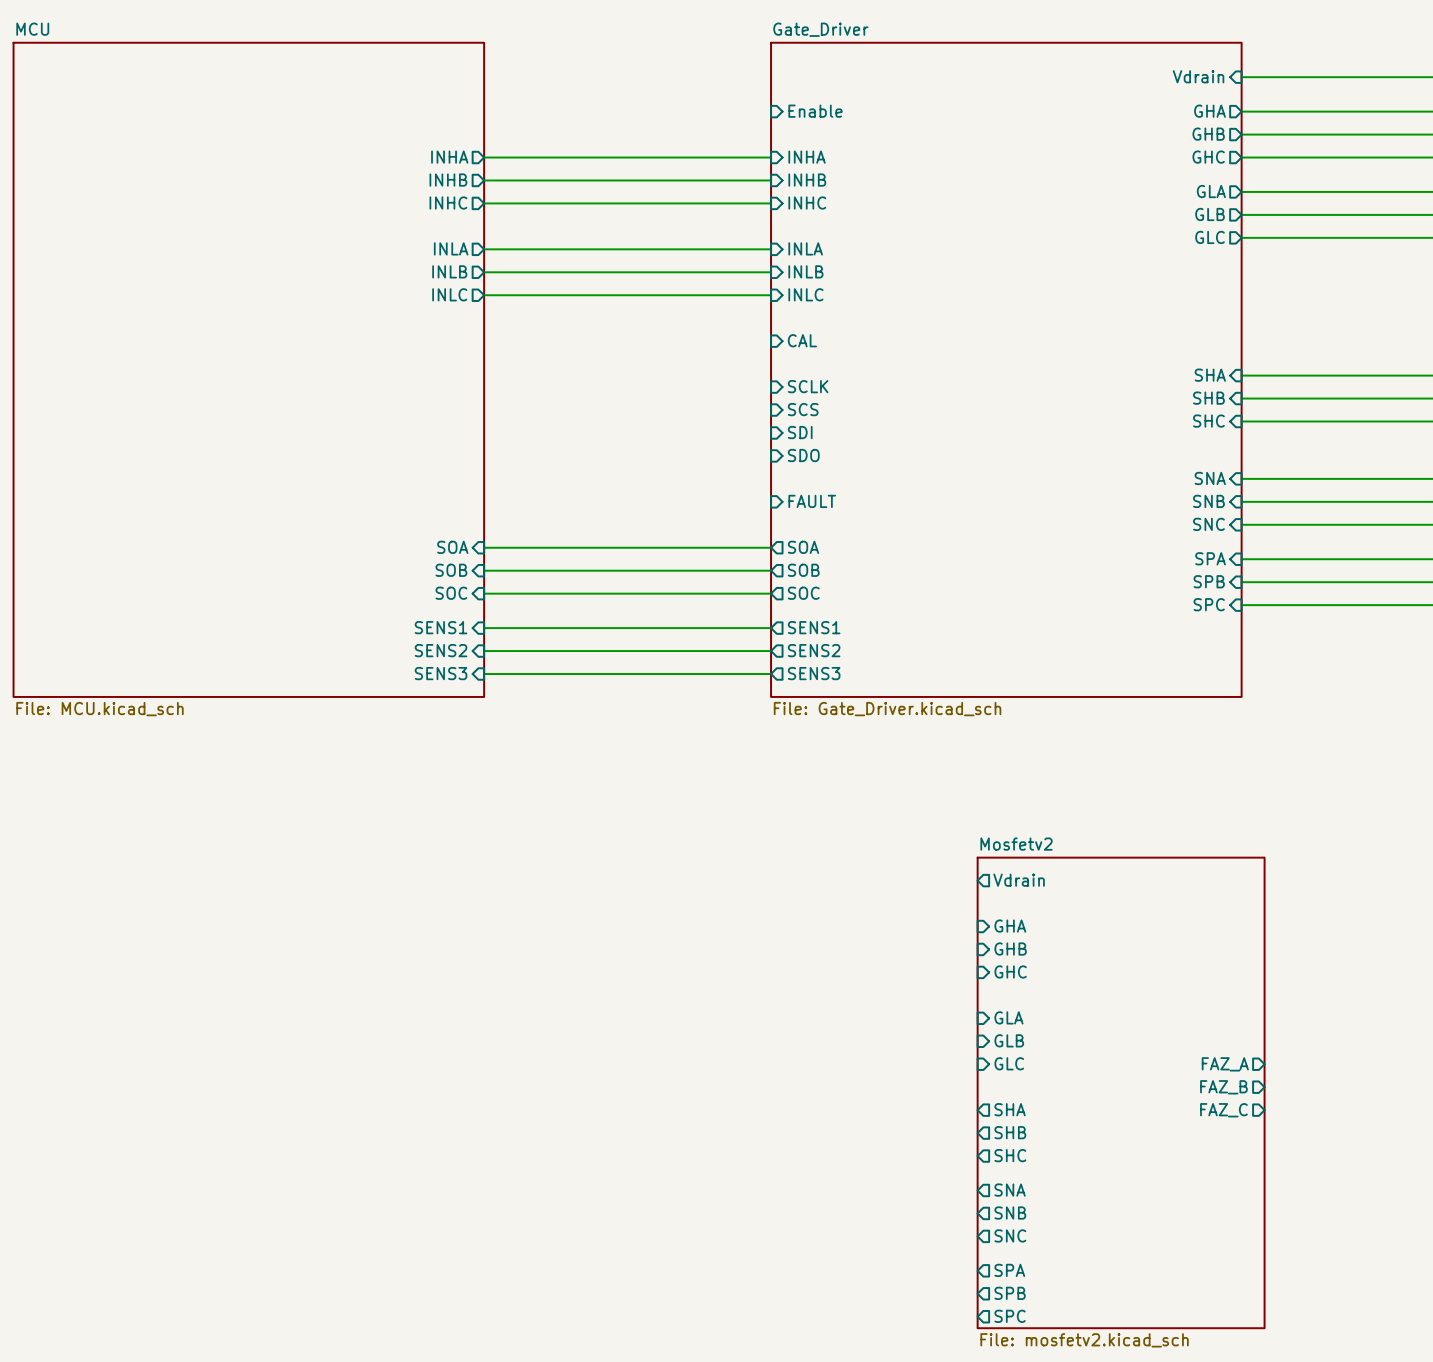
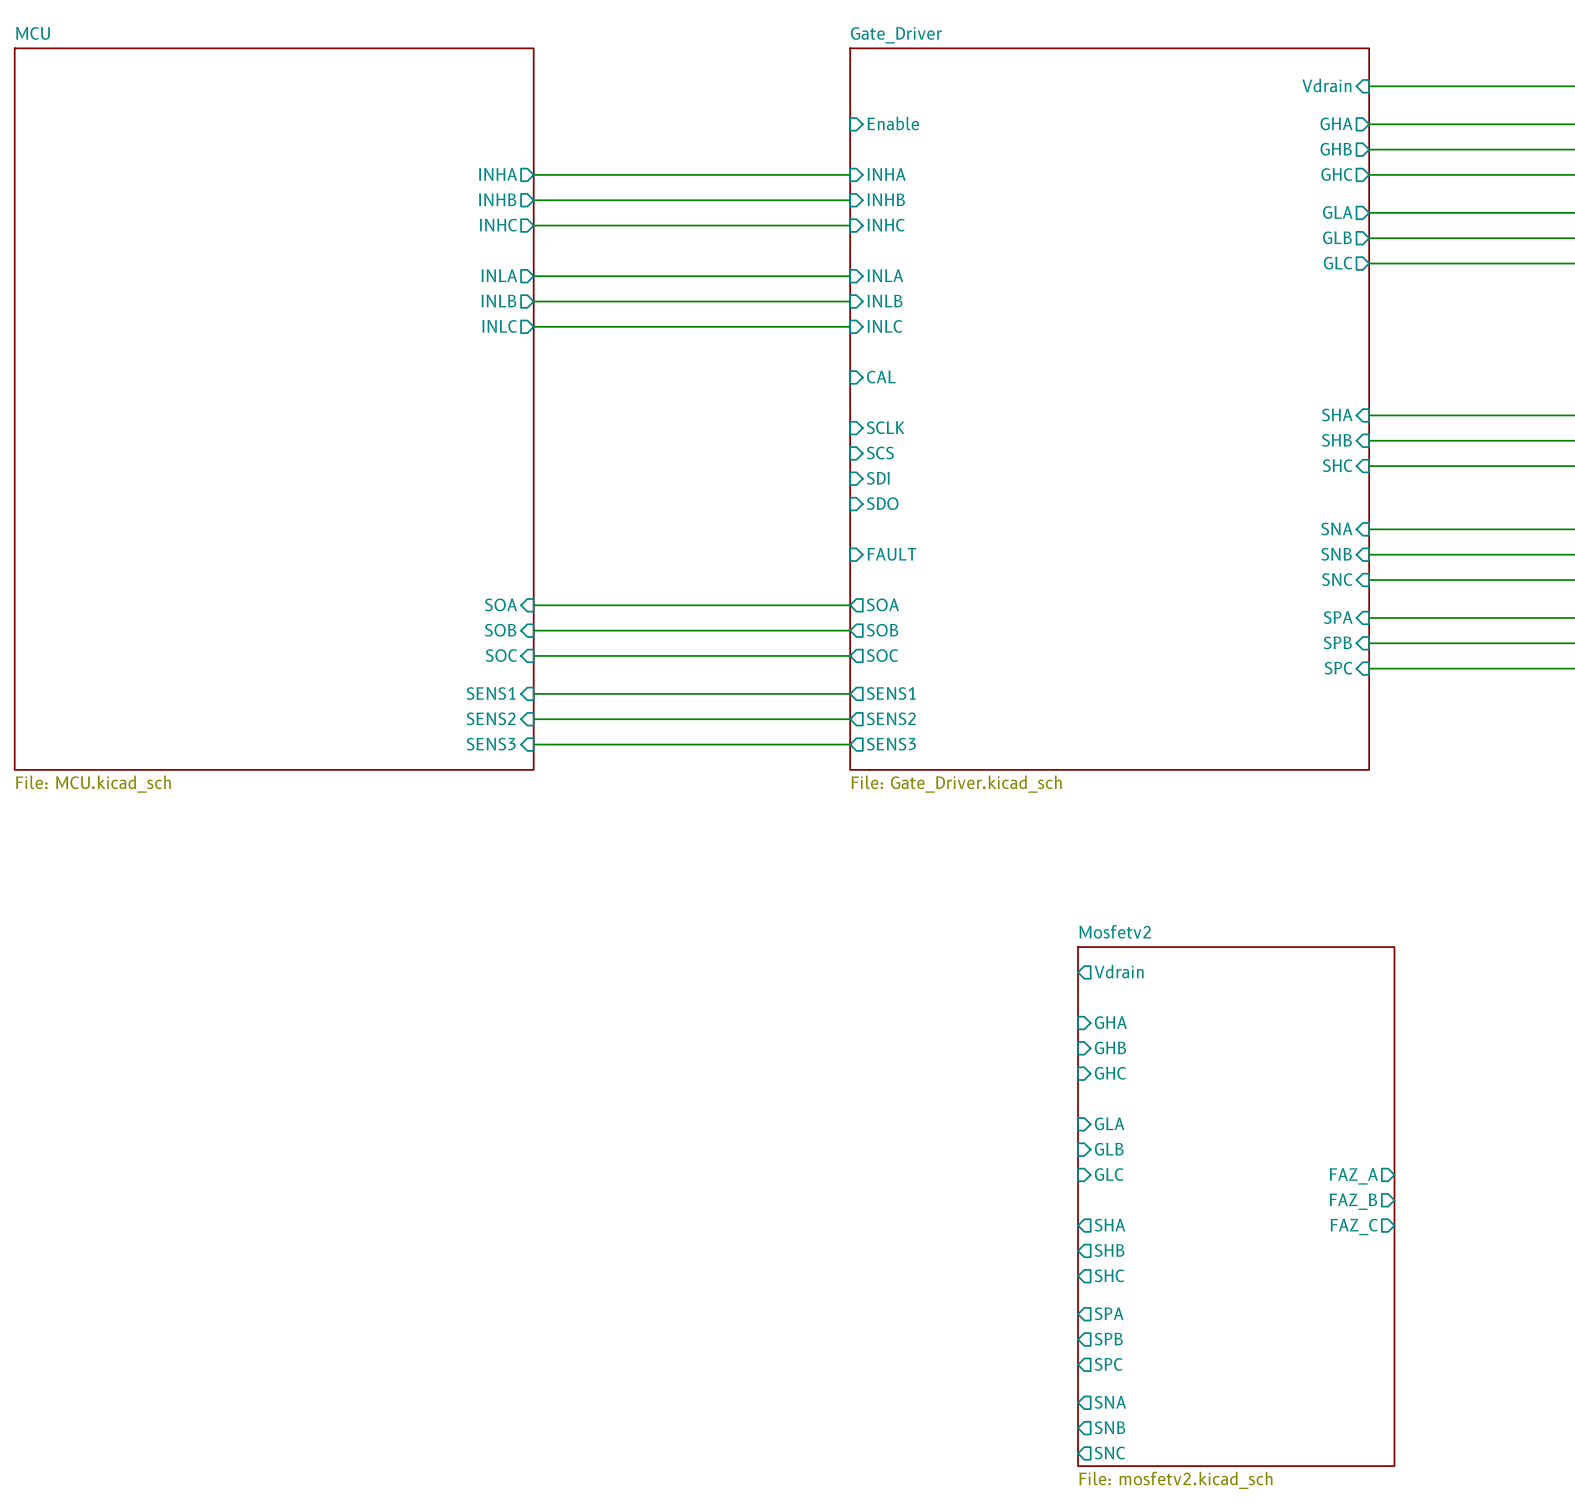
sheet pin: SNA (1010, 1190) -> SPA (1109, 1313)
sheet pin: SNB (1010, 1213) -> SPB (1108, 1339)
sheet pin: SNC (1010, 1235) -> SPC (1108, 1364)
sheet pin: SPA (1009, 1270) -> SNA (1110, 1402)
sheet pin: SPB (1010, 1293) -> SNB (1110, 1427)
sheet pin: SPC (1010, 1316) -> SNC (1109, 1453)

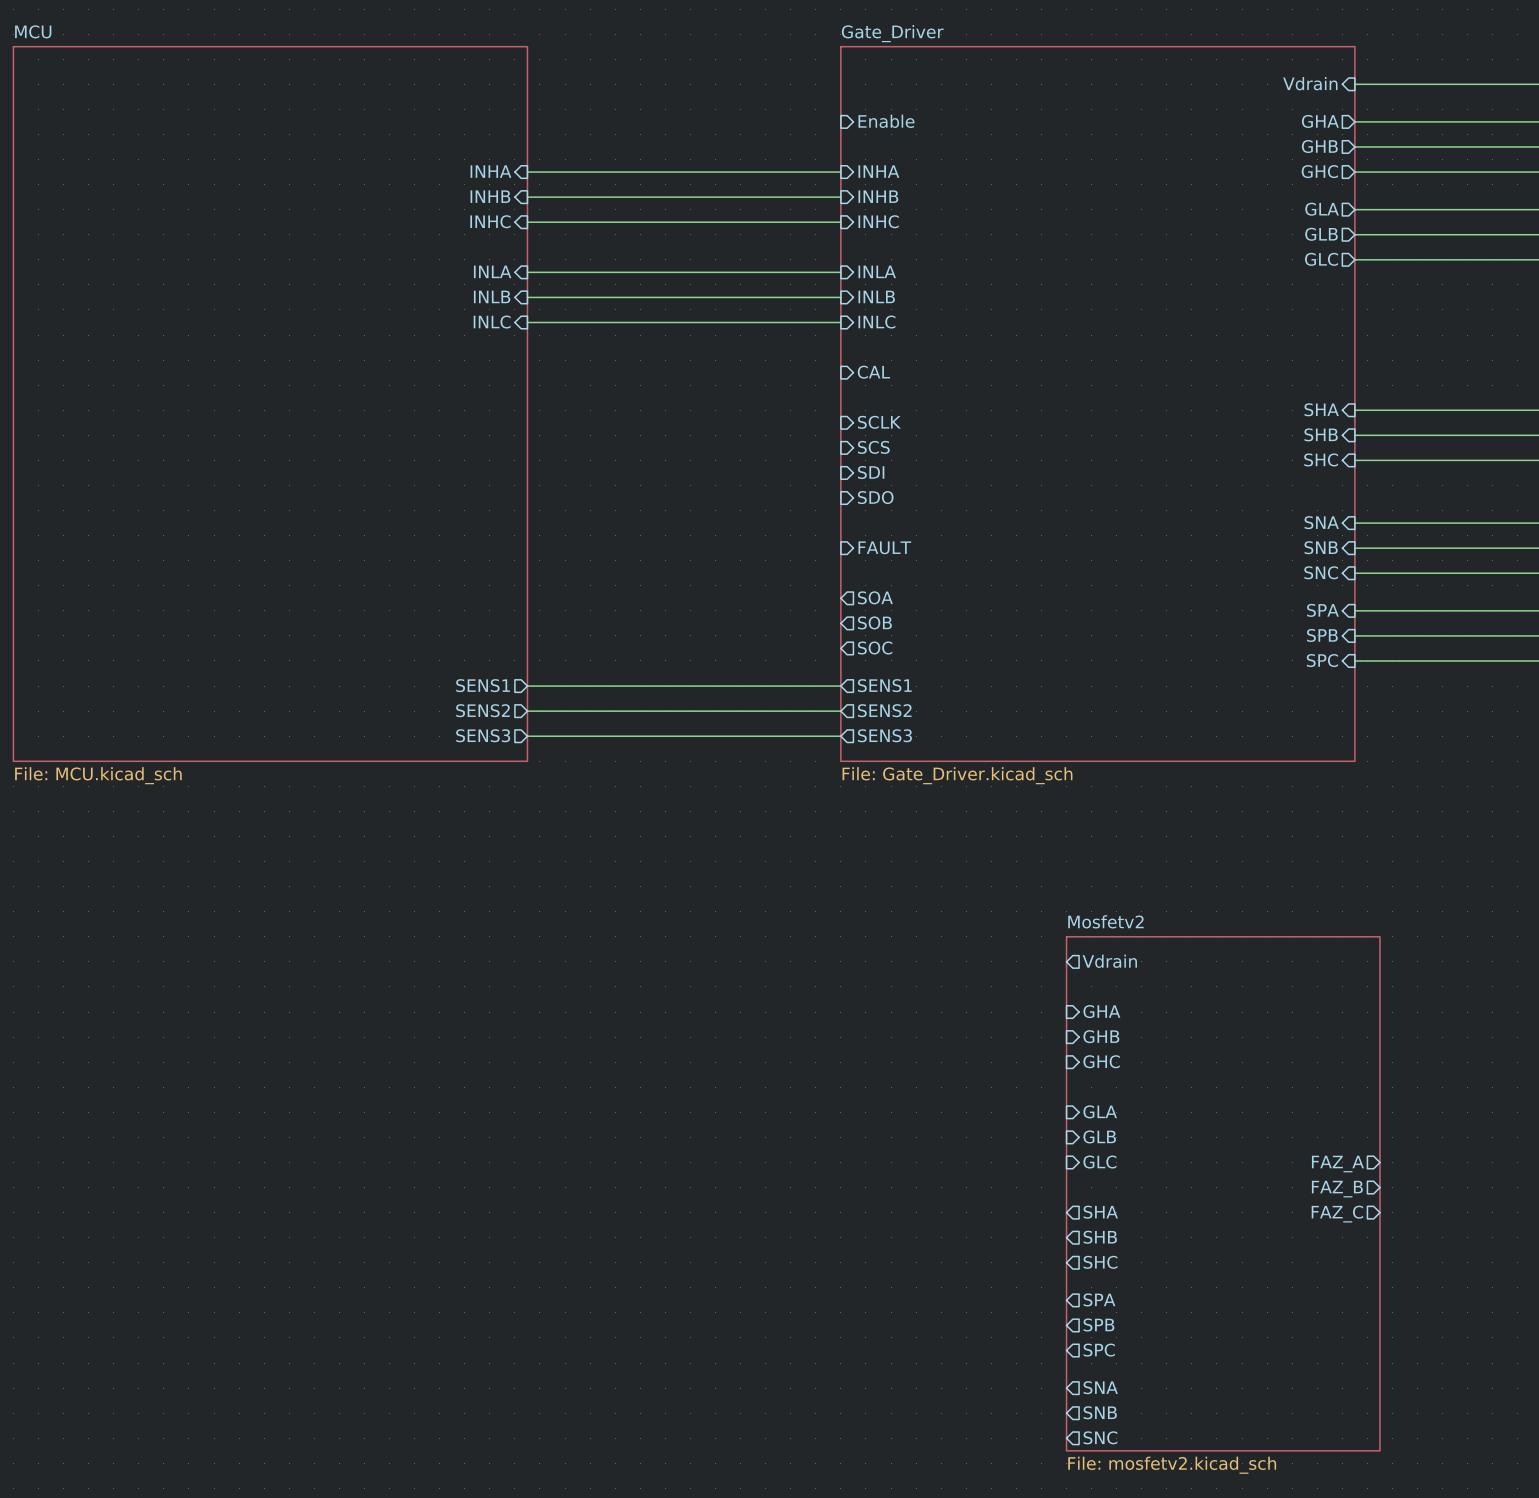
sheet pin shape: output (498, 174) -> input (490, 171)
sheet pin shape: output (497, 199) -> input (490, 196)
sheet pin shape: output (498, 225) -> input (490, 221)
sheet pin shape: output (499, 275) -> input (492, 271)
sheet pin shape: output (498, 301) -> input (492, 296)
sheet pin shape: output (499, 326) -> input (492, 322)
sheet pin: SOA (501, 604) -> none
wire: (533, 605) (850, 605) -> none
sheet pin: SOB (500, 630) -> none
wire: (533, 630) (850, 630) -> none
sheet pin: SOC (501, 655) -> none
wire: (533, 655) (850, 655) -> none
sheet pin shape: input (491, 693) -> output (483, 685)
sheet pin shape: input (491, 718) -> output (482, 710)
sheet pin shape: input (491, 744) -> output (483, 735)

